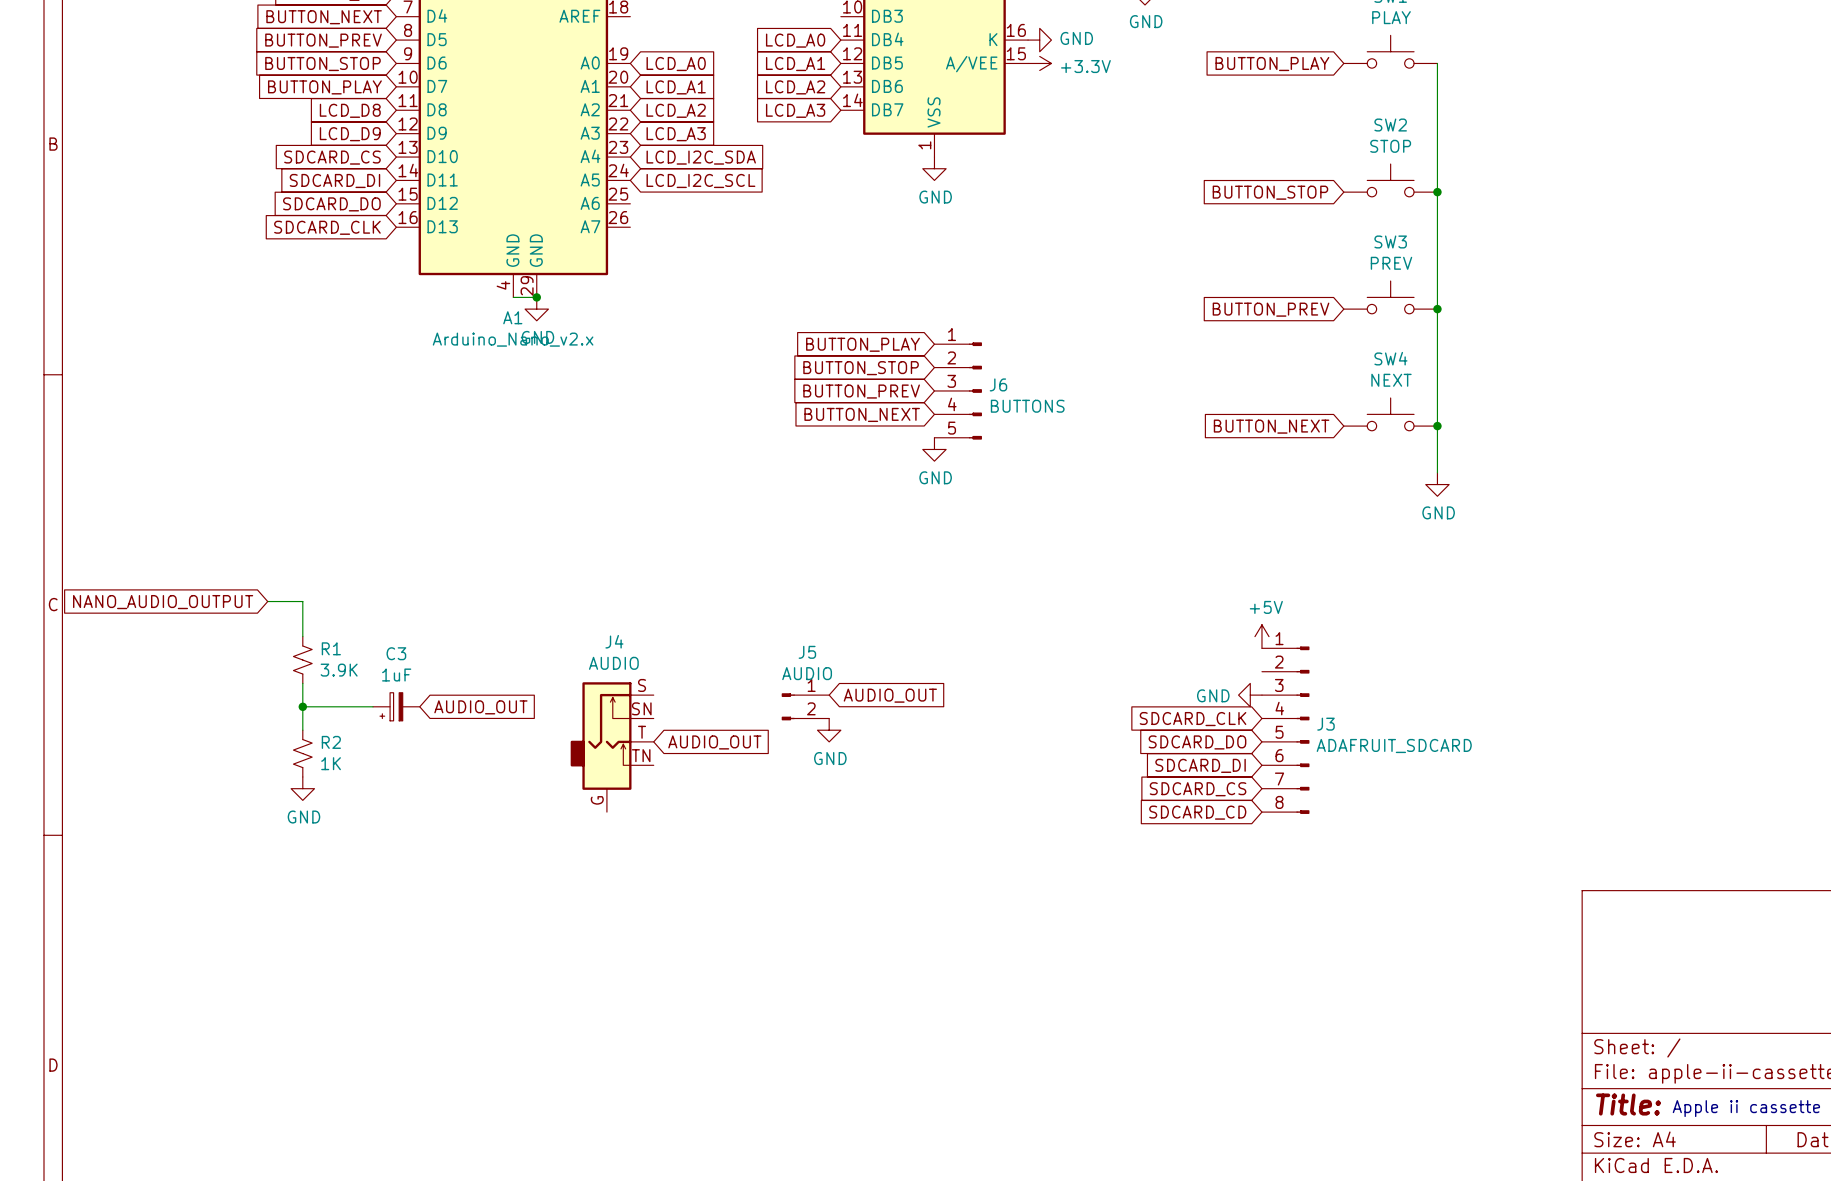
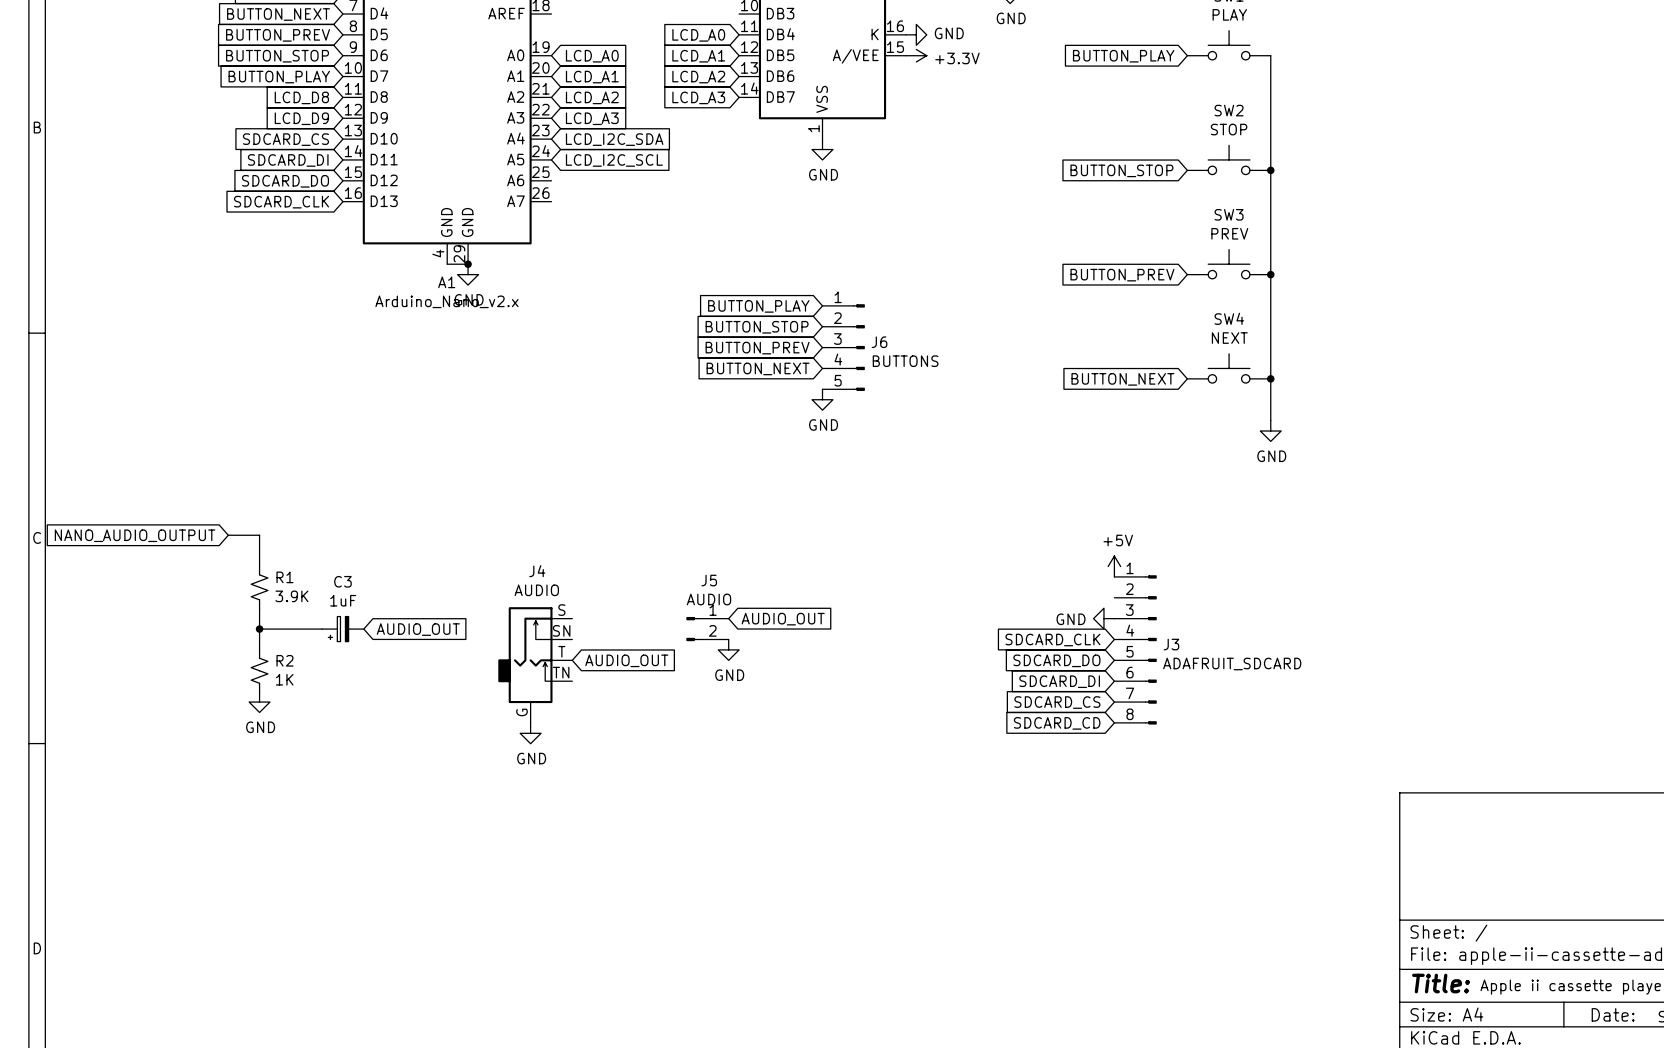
power symbol: none -> GND (530, 733)

